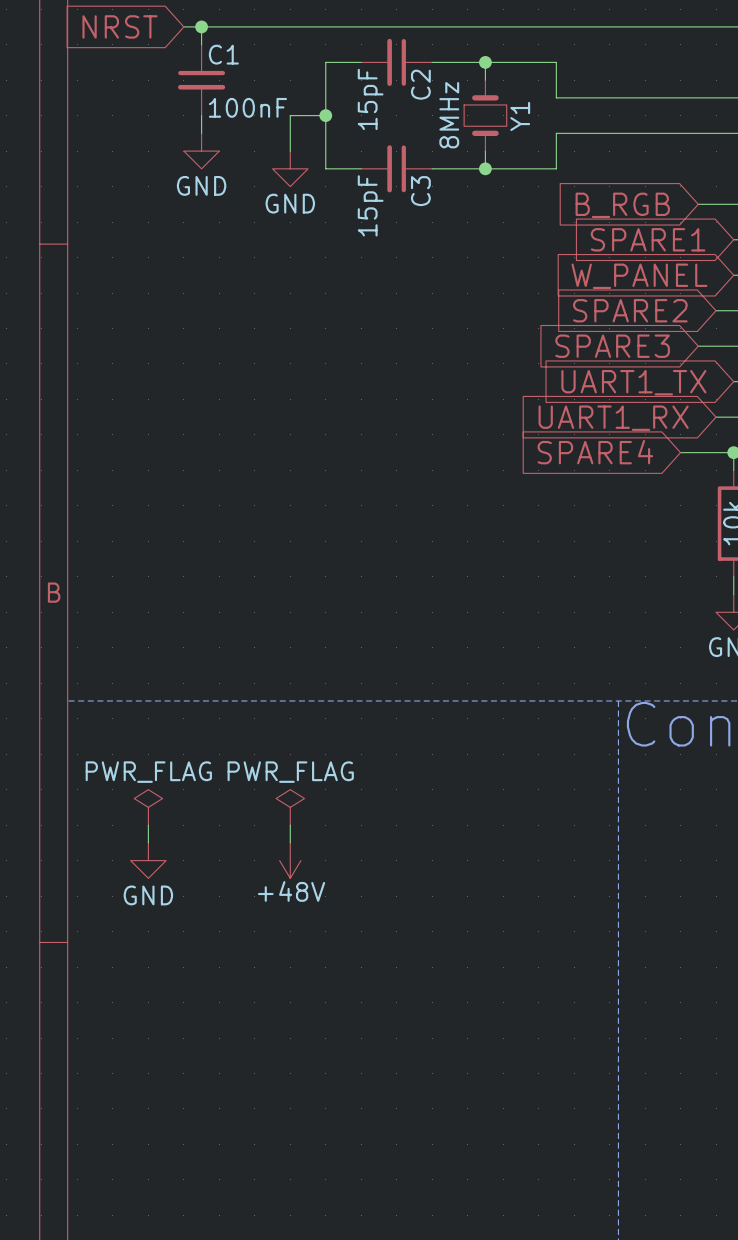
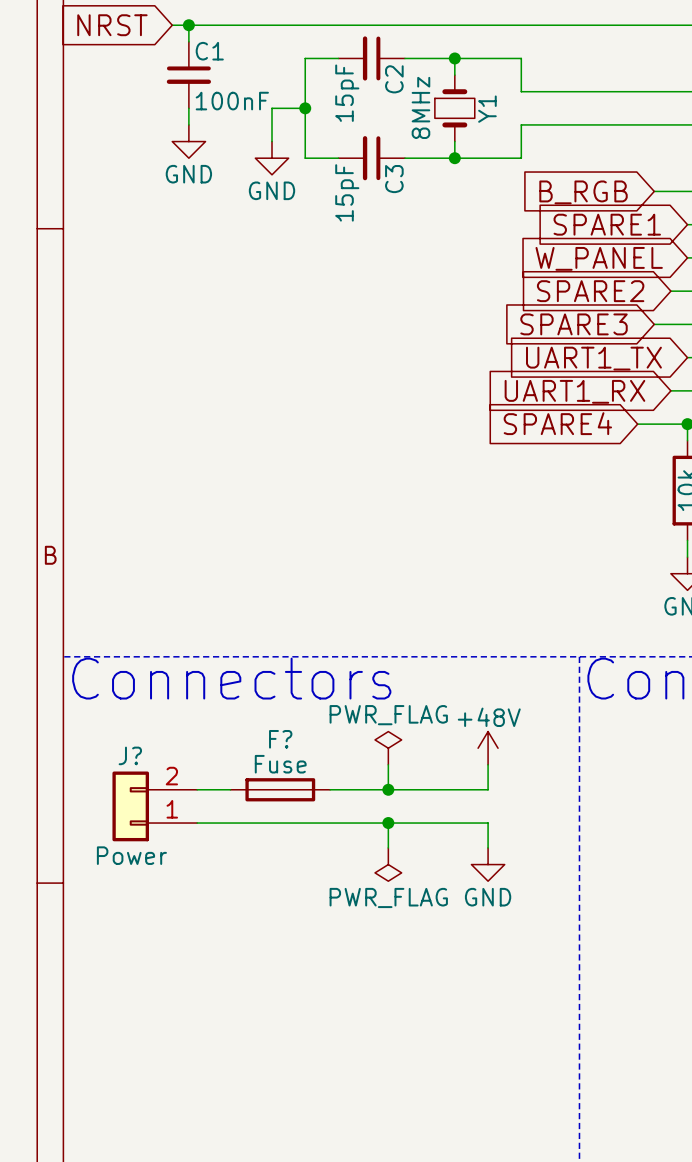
text: none -> Connectors (231, 678)
power symbol: none -> PWR_FLAG (388, 748)
power symbol: PWR_FLAG (148, 807) -> none
power symbol: PWR_FLAG (290, 807) -> none
wire: none -> (388, 764) (388, 789)
wire: none -> (488, 764) (488, 789) (330, 789)
wire: (290, 825) (290, 842) -> none
wire: none -> (197, 789) (230, 789)
F?: none -> Fuse (280, 789)
junction: none -> (388, 789)
power symbol: GND (148, 860) -> none
J?: none -> Power (154, 806)
power symbol rotation: 0° (290, 860) -> 180° (488, 748)
power symbol position: +48V (290, 860) -> +48V (488, 748)
wire: none -> (197, 823) (488, 823) (488, 847)
wire: none -> (388, 823) (388, 847)
junction: none -> (388, 823)
power symbol: none -> PWR_FLAG (388, 864)
power symbol: none -> GND (488, 864)

